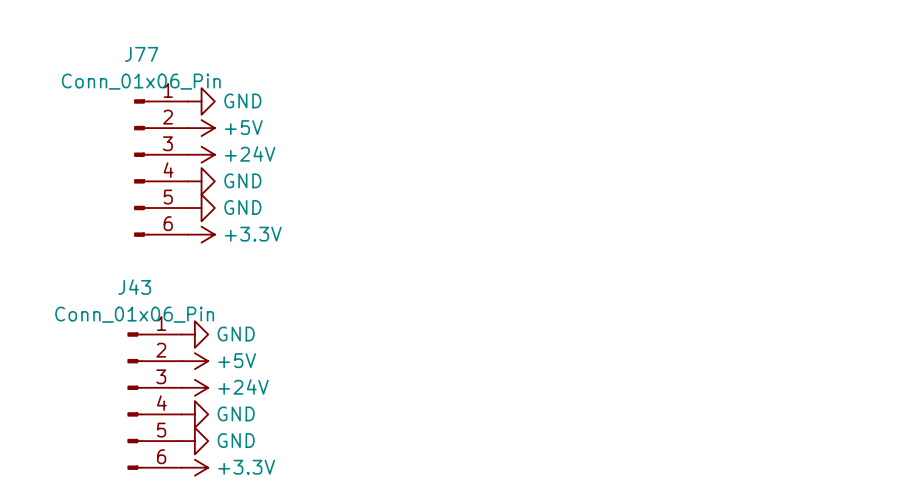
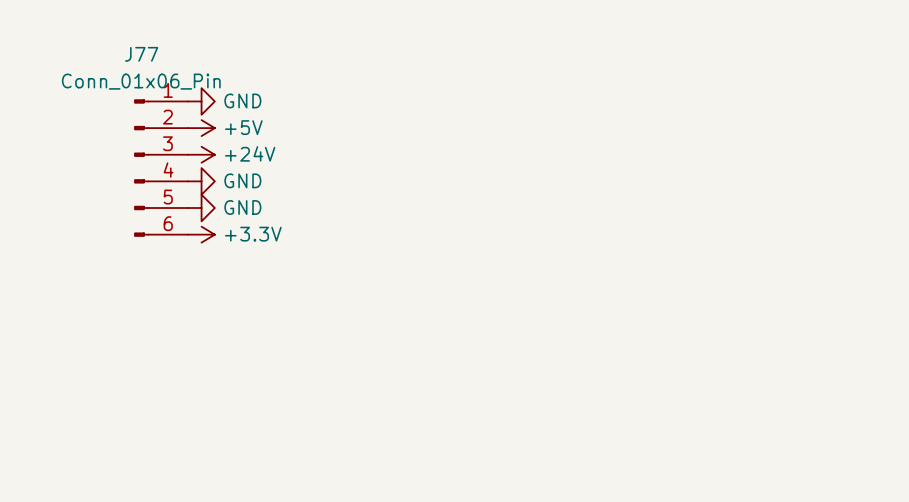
power symbol: GND (194, 334) -> none
power symbol: +5V (194, 361) -> none
power symbol: +24V (194, 387) -> none
J43: Conn_01x06_Pin (154, 401) -> none
power symbol: GND (194, 414) -> none
power symbol: GND (194, 441) -> none
power symbol: +3.3V (194, 467) -> none

